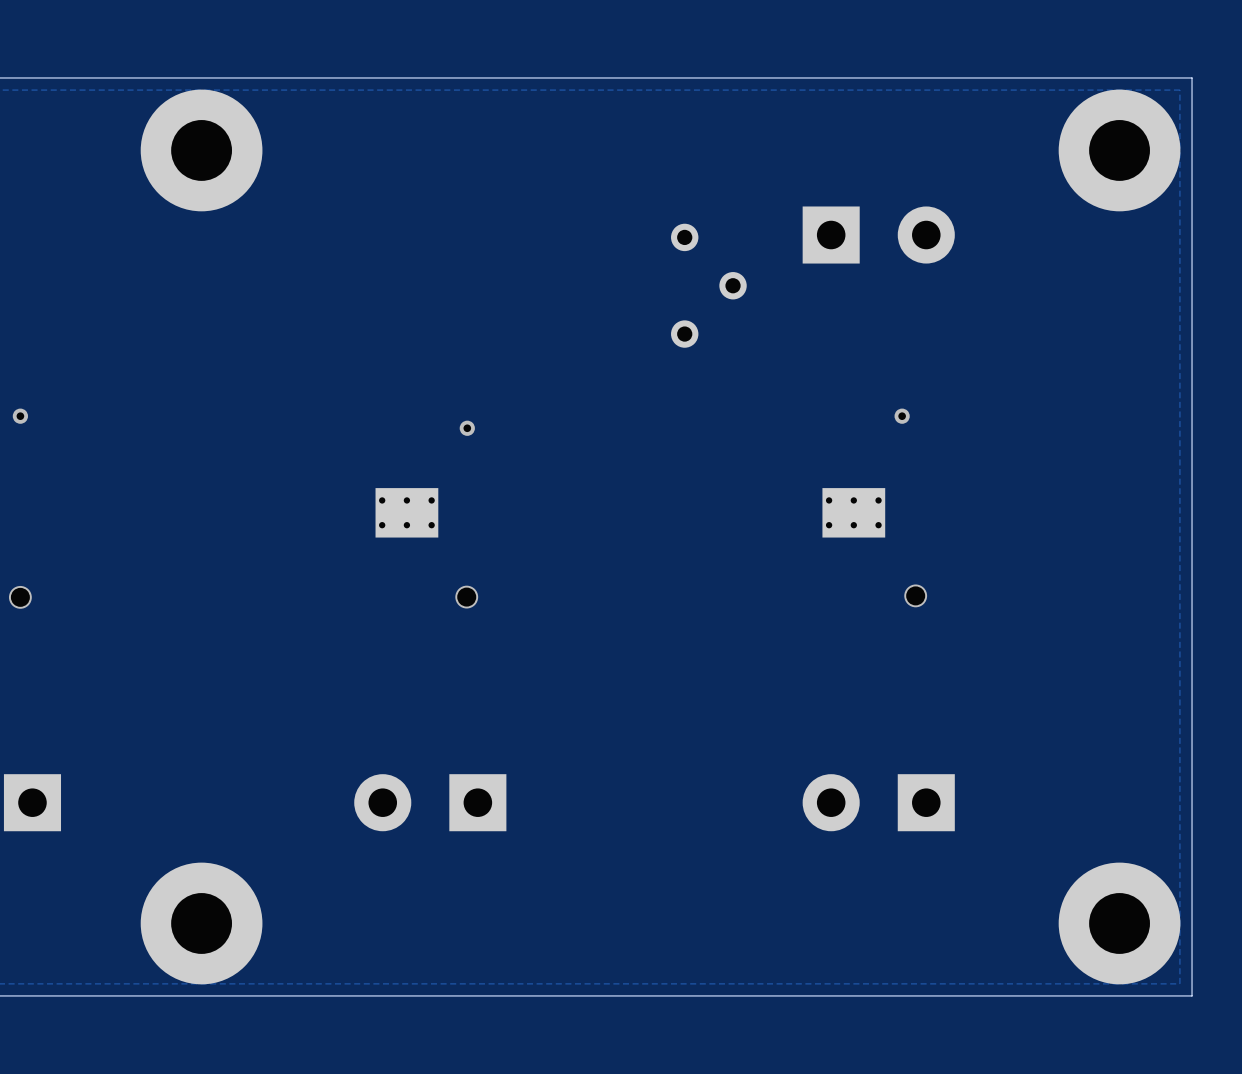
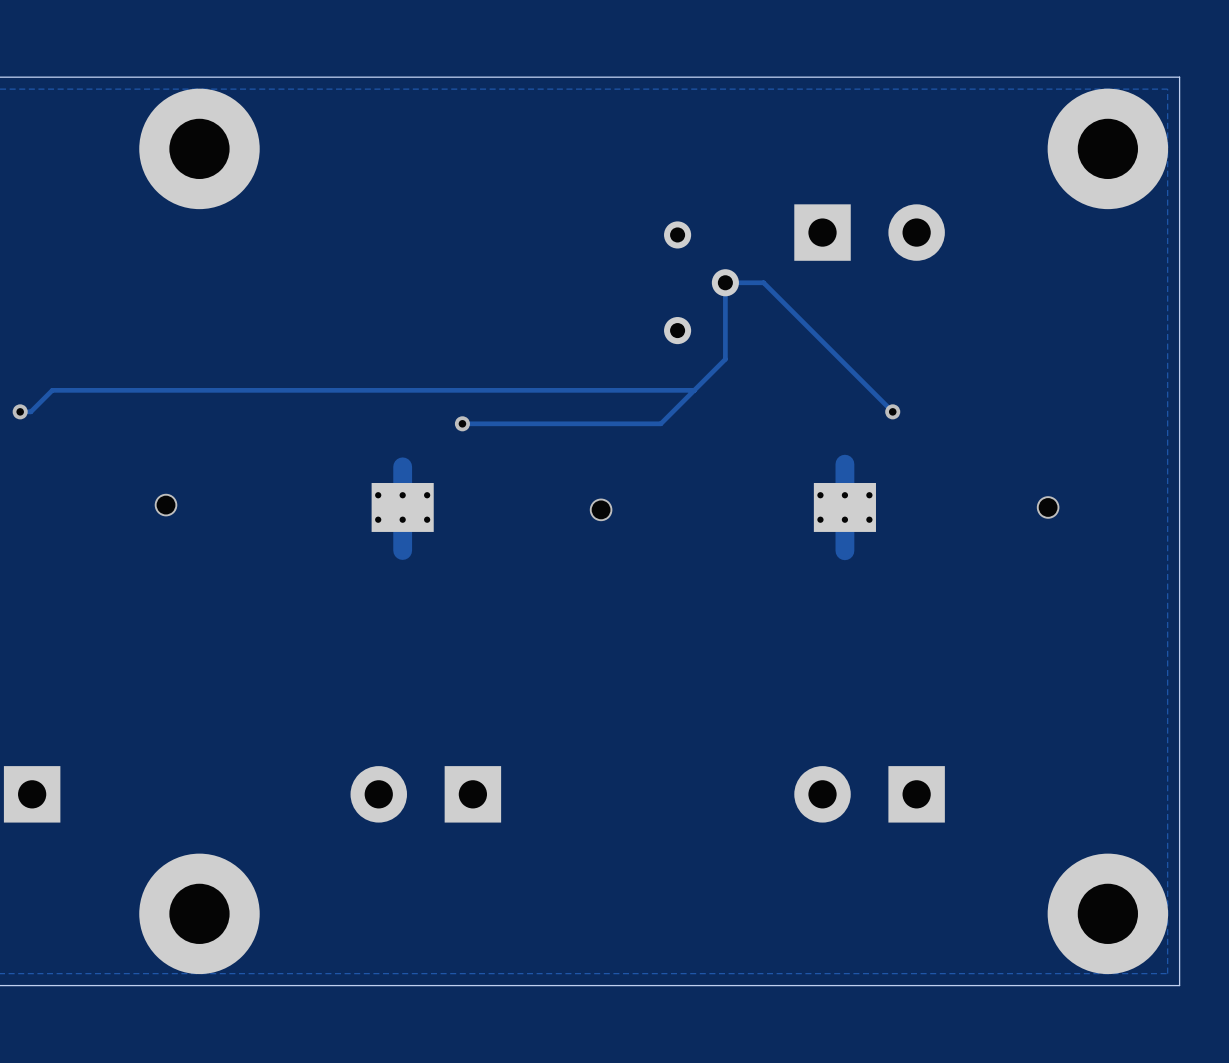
track: none -> (694, 390) (52, 390) (30, 411) (20, 411)
track: none -> (892, 411) (763, 282) (725, 282) (725, 359) (660, 423) (462, 423)
track: none -> (844, 464) (844, 550)
track: none -> (402, 466) (402, 550)
via: none -> (166, 505)
via: none -> (1048, 507)
via: none -> (601, 509)
via: (915, 595) -> none
via: (20, 597) -> none
via: (466, 597) -> none

